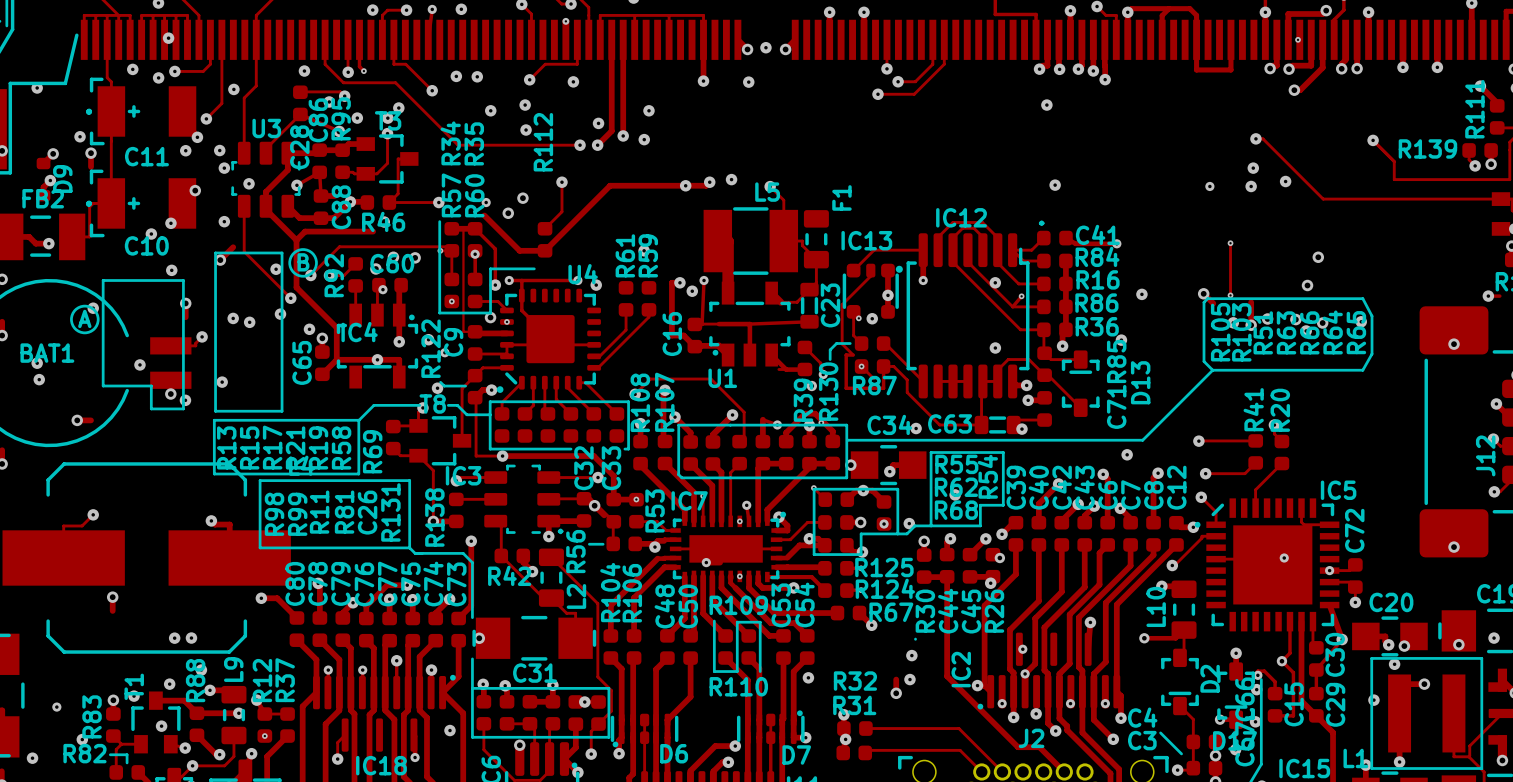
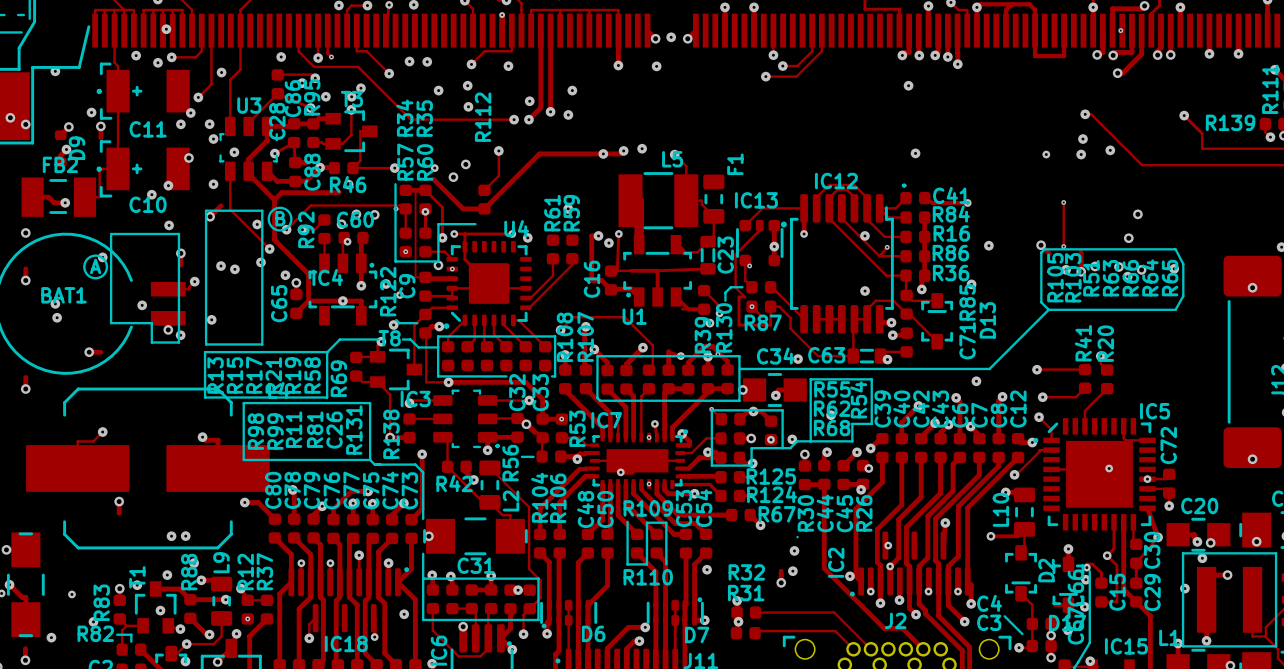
via: (872, 318) -> none
via: (1220, 719) -> none

